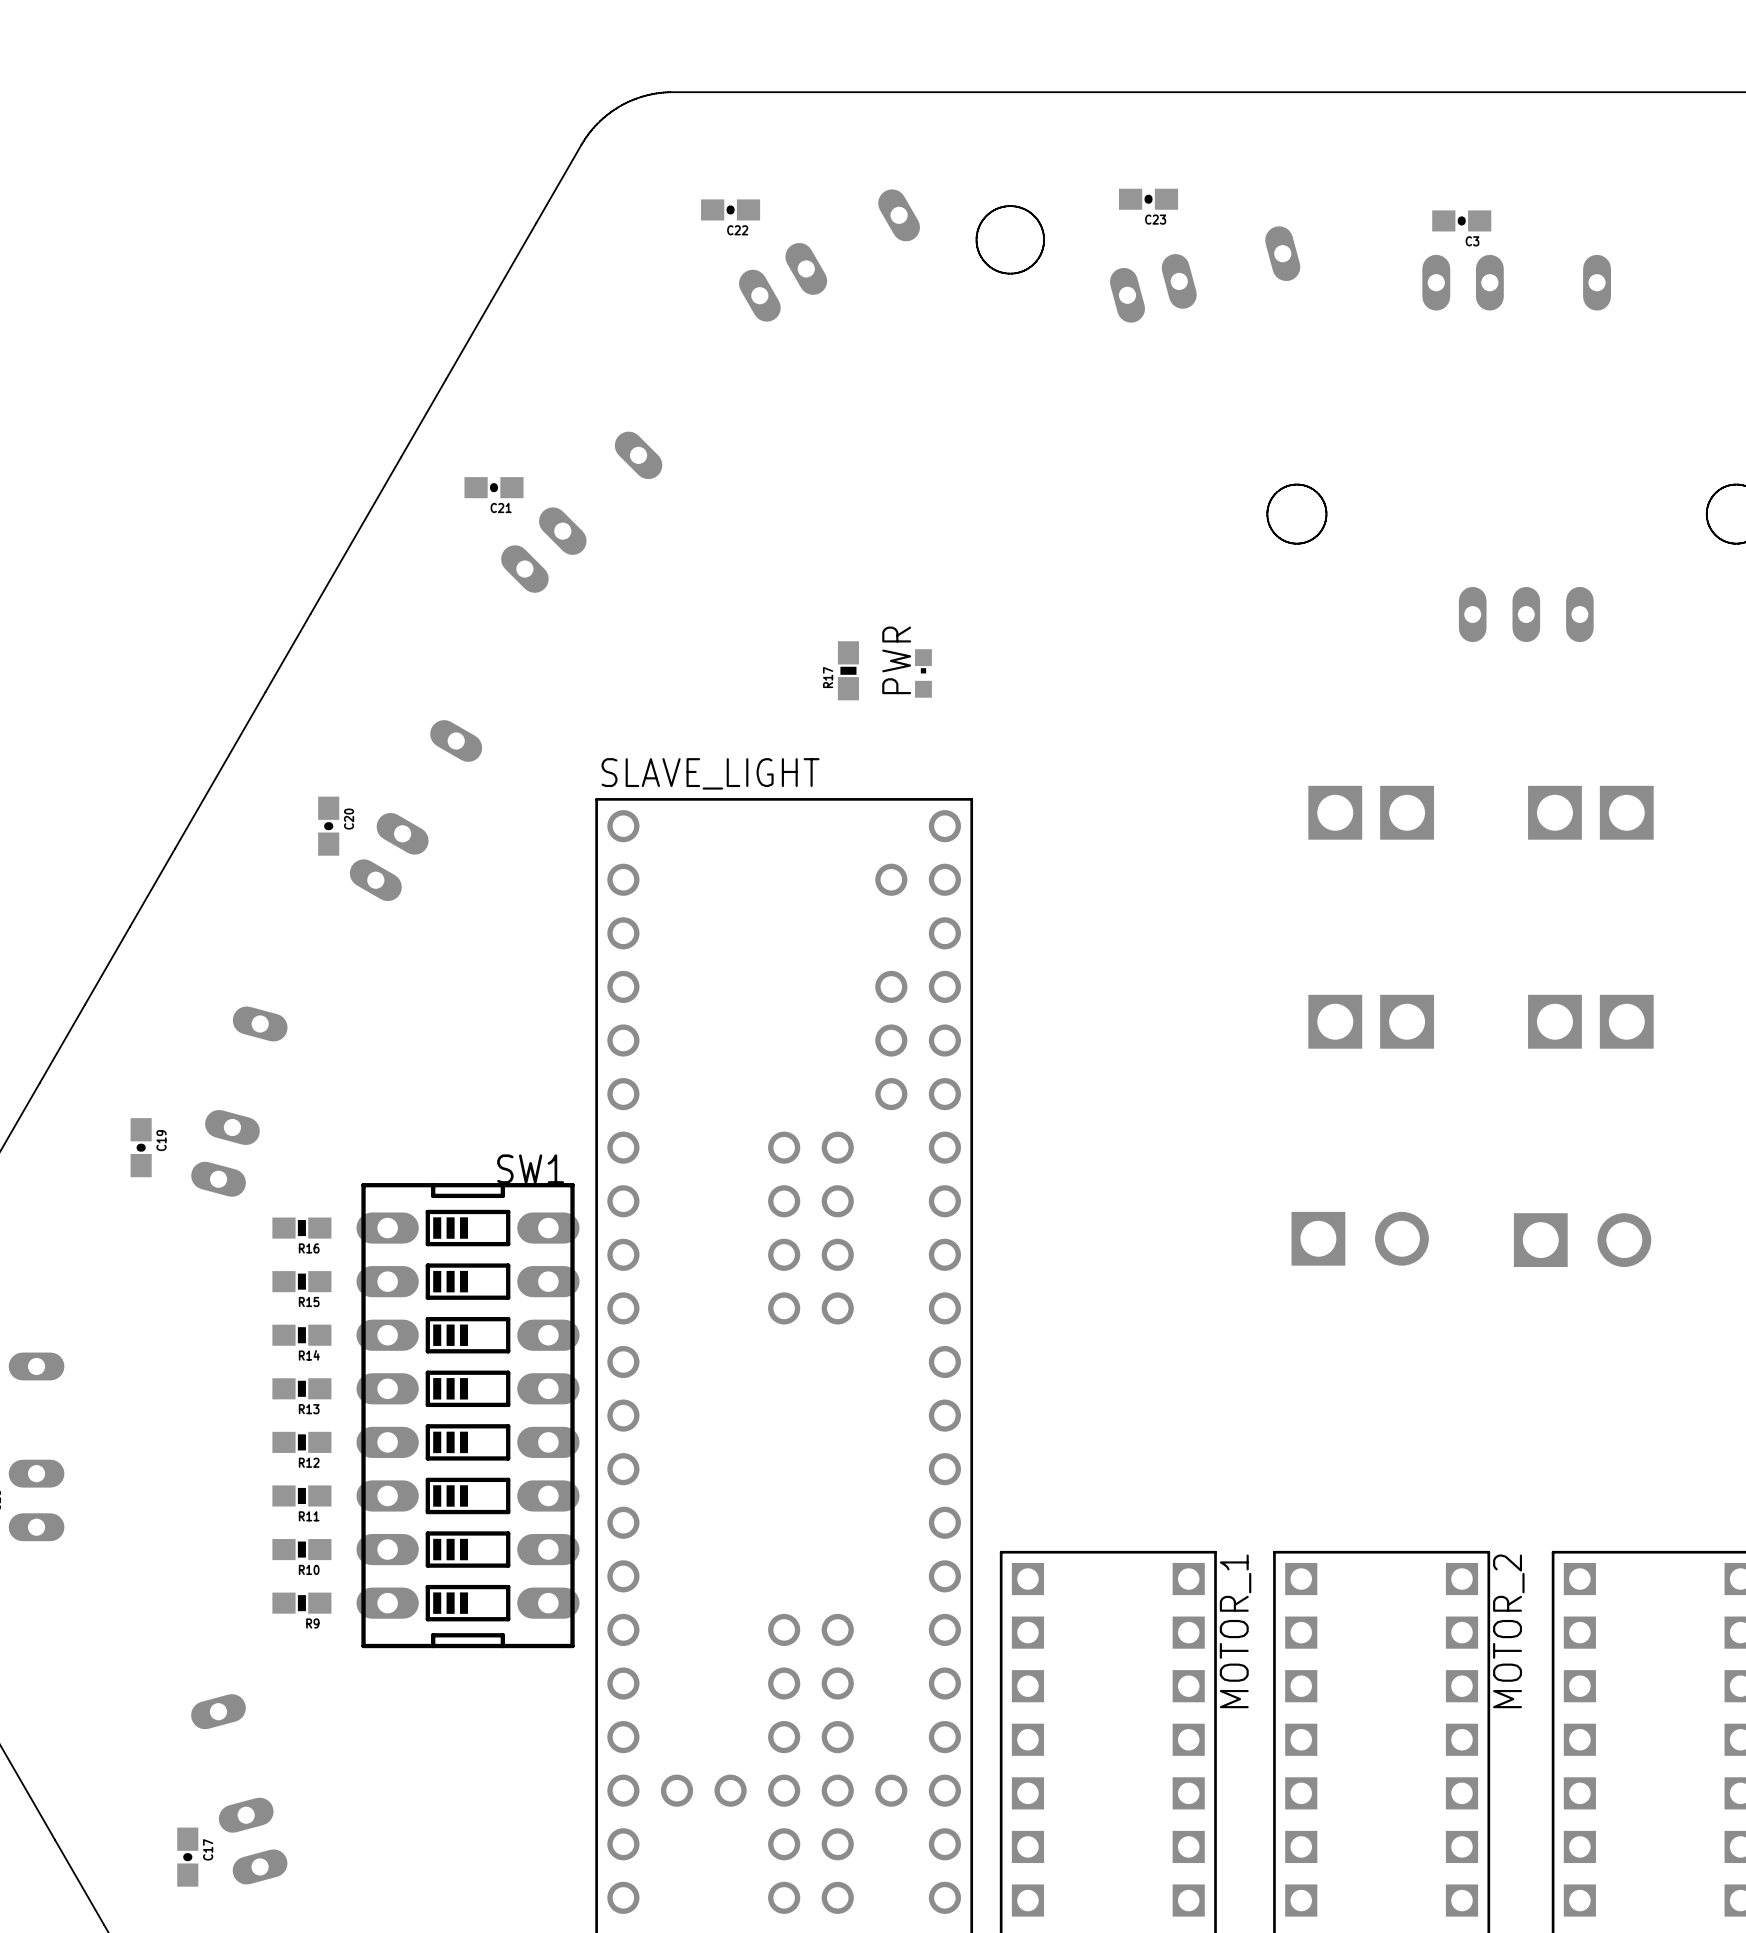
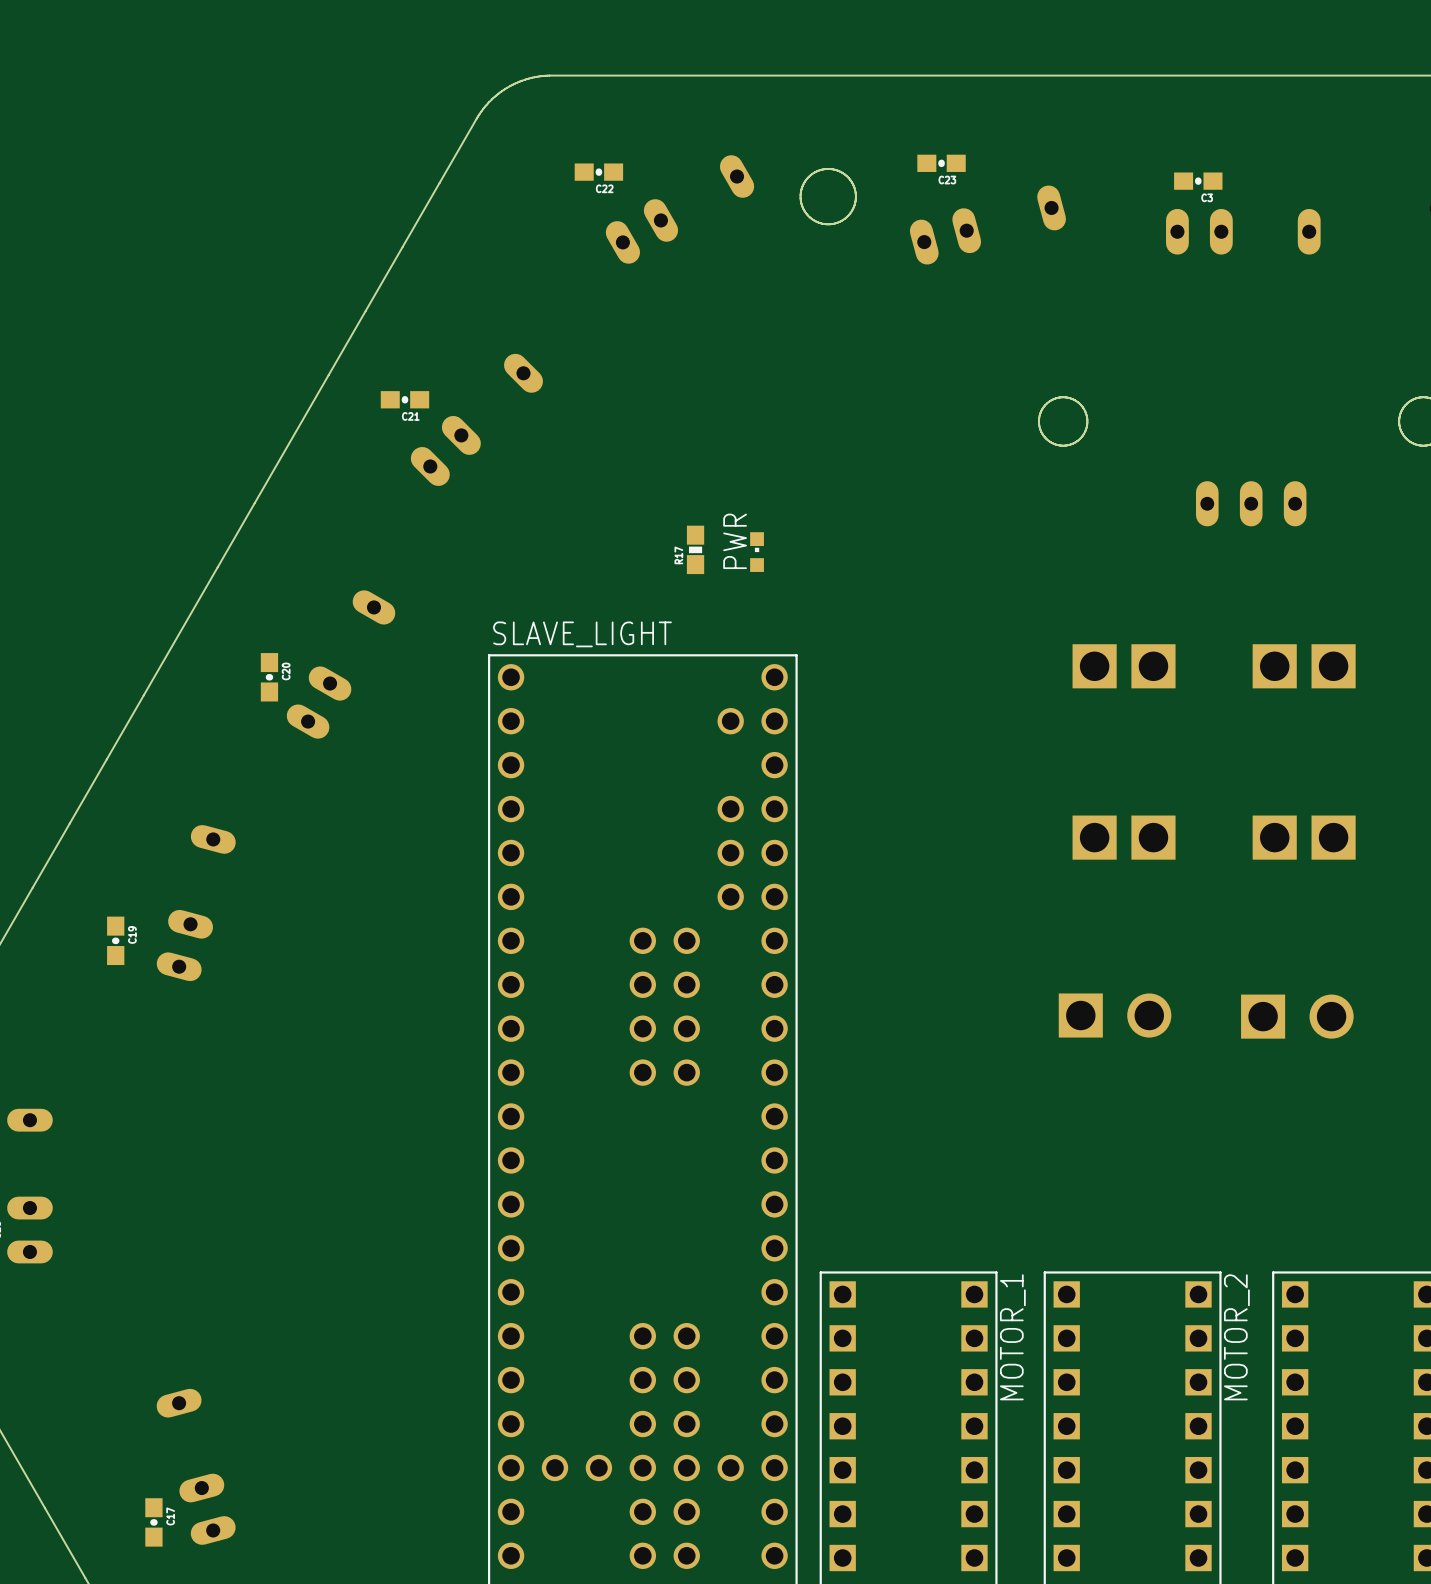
R16: (301, 1228) -> none
R15: (301, 1281) -> none
R14: (301, 1335) -> none
R13: (301, 1388) -> none
SW1: (468, 1415) -> none
R12: (301, 1442) -> none
R11: (301, 1495) -> none
R10: (301, 1549) -> none
R9: (301, 1603) -> none

